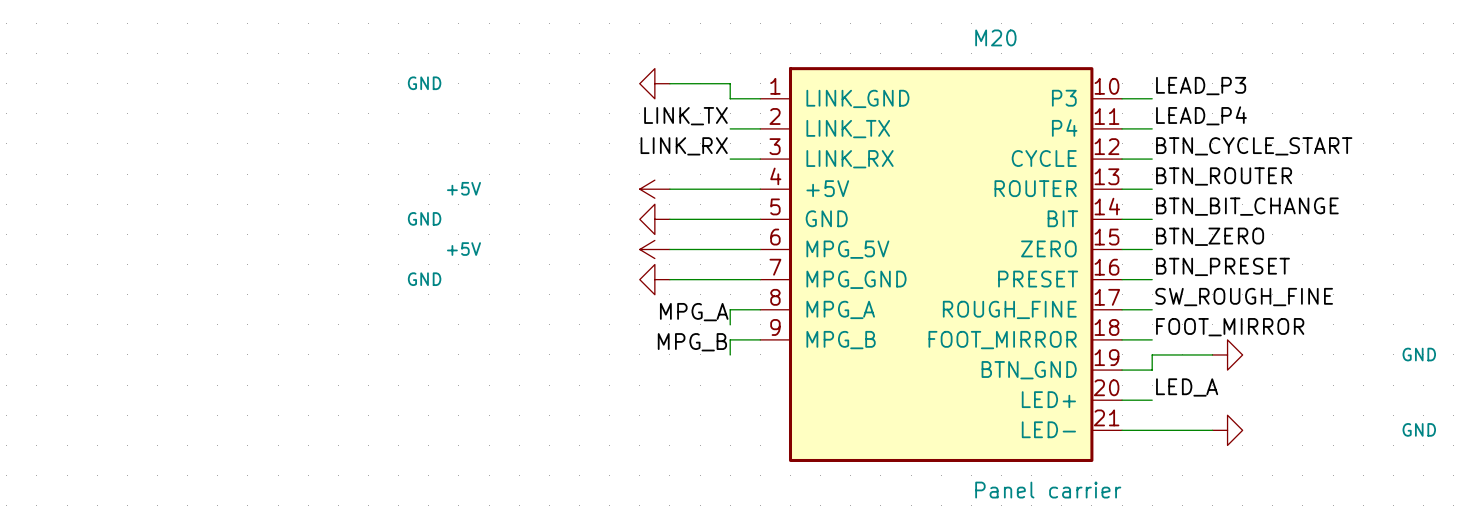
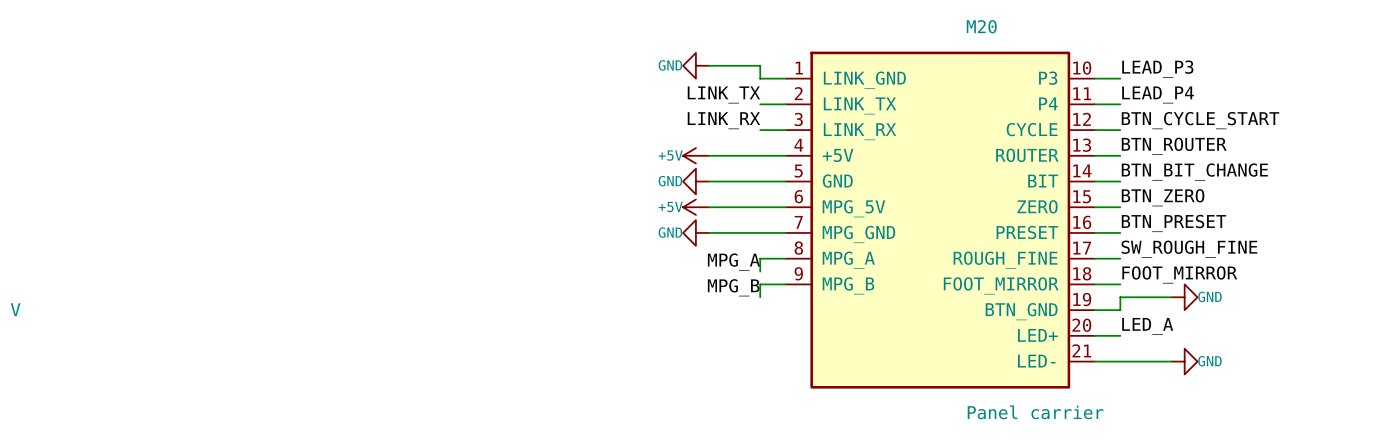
power symbol text position: GND (424, 83) -> GND (670, 65)
power symbol text position: +5V (463, 188) -> +5V (670, 155)
power symbol text position: GND (424, 218) -> GND (670, 181)
power symbol text position: +5V (463, 249) -> +5V (670, 206)
power symbol text position: GND (424, 279) -> GND (670, 232)
power symbol text position: GND (1419, 354) -> GND (1209, 296)
power symbol text position: GND (1419, 429) -> GND (1209, 361)

